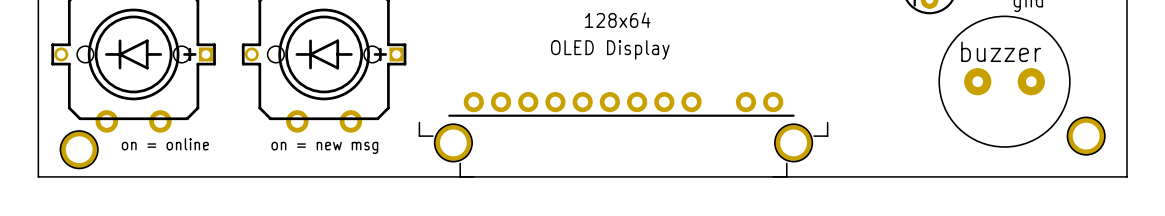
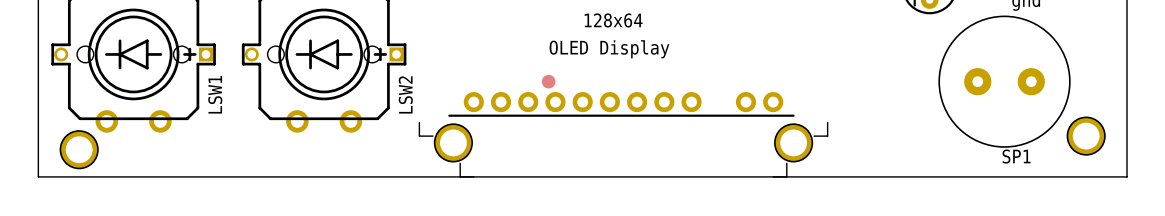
text: buzzer (1001, 51) -> none
part: none -> (548, 81)
LSW1 name: none -> LSW1 (215, 94)
LSW2 name: none -> LSW2 (405, 94)
text: on = online (165, 144) -> none
text: on = new msg (324, 147) -> none
SP1 name: none -> SP1 (1016, 156)

